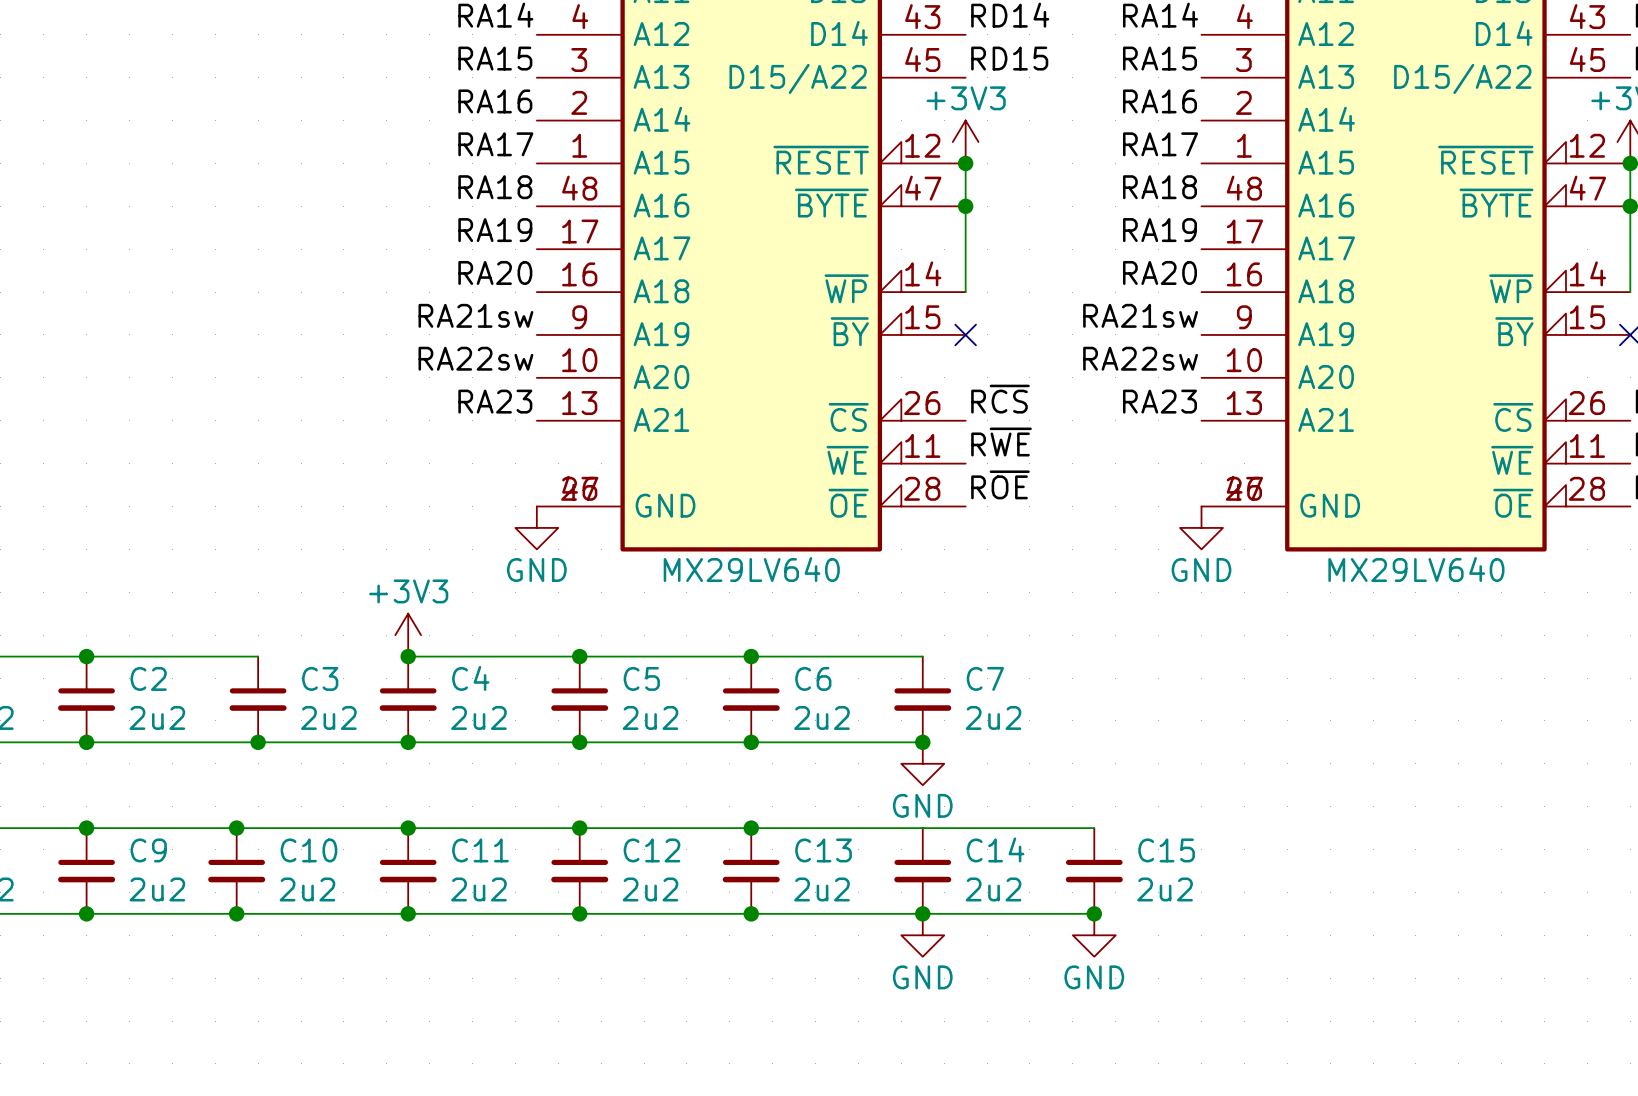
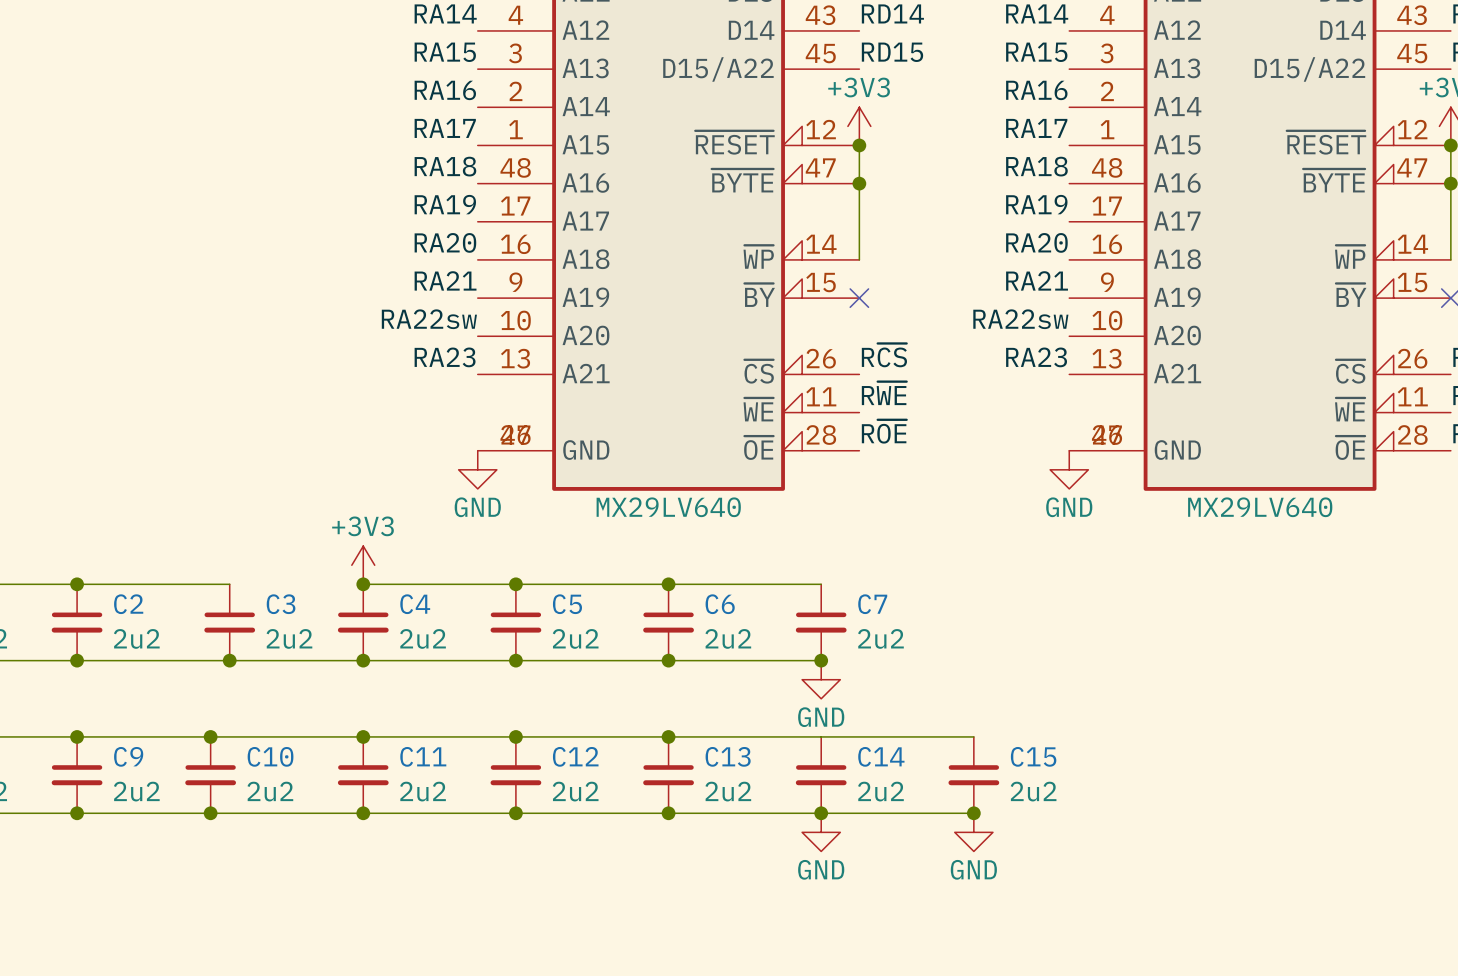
label: RA21sw (475, 315) -> RA21 (445, 280)
label: RA21sw (1140, 315) -> RA21 (1037, 280)

